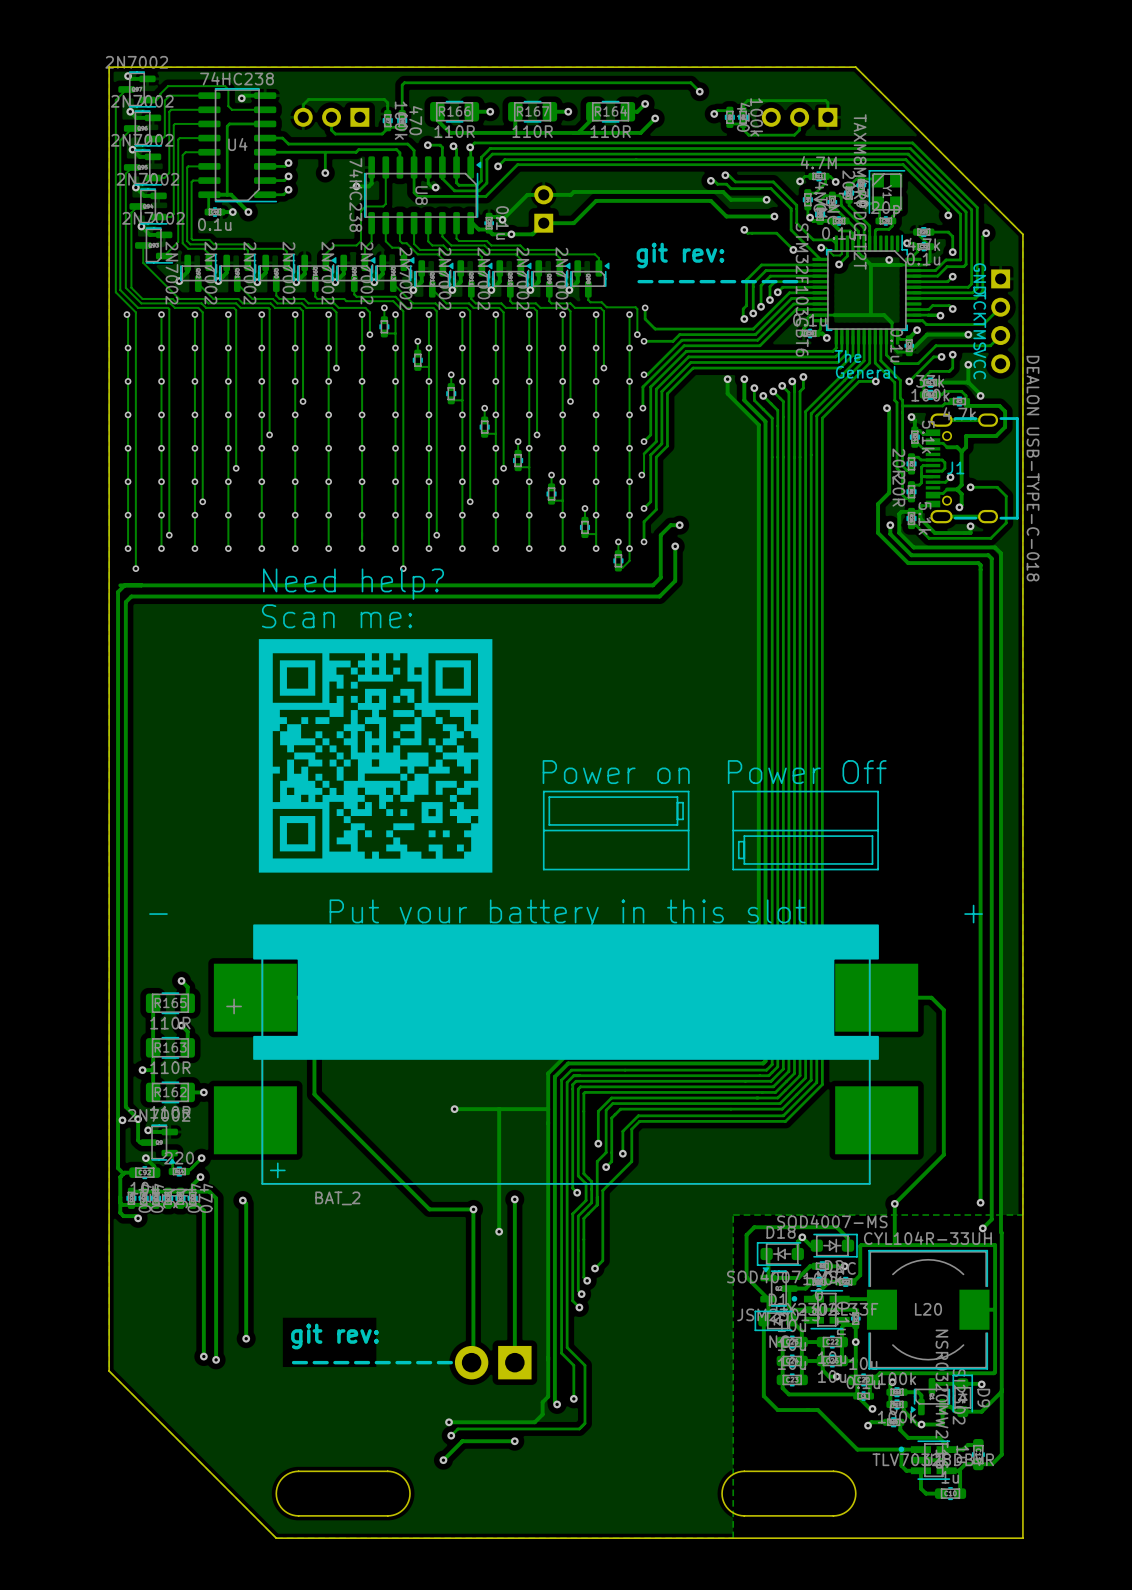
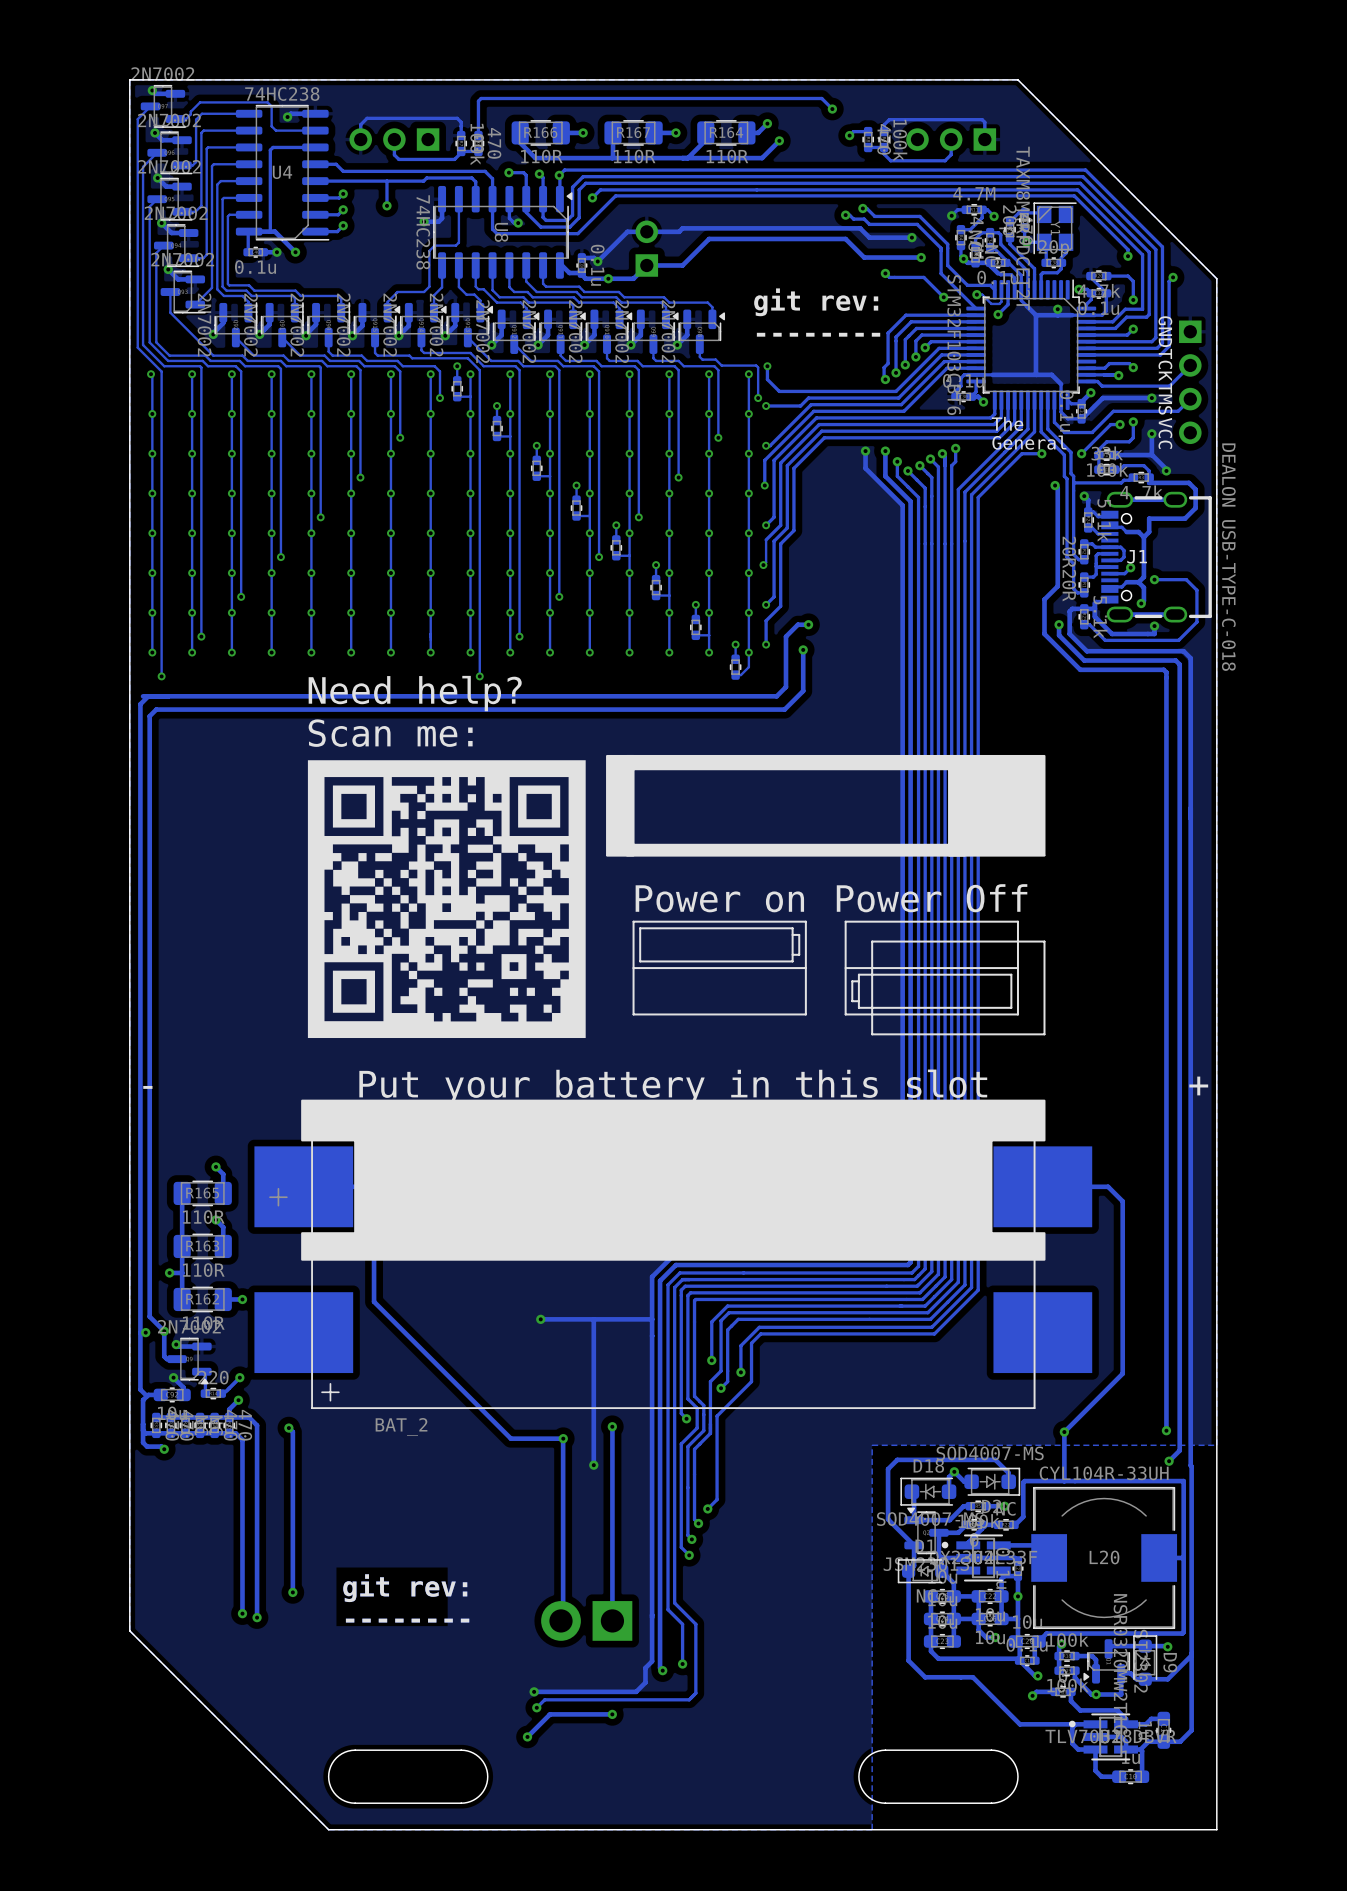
drawing: none -> [606, 754, 1046, 857]
text position: Power on (616, 772) -> Power on (719, 898)
text position: Power Off (807, 772) -> Power Off (932, 898)
line: none -> (792, 928) (792, 961) (640, 961) (640, 928) (792, 928)
line: (688, 791) (543, 791) (543, 869) (688, 869) (688, 791) -> (1017, 921) (845, 921) (845, 1014) (1017, 1014) (1017, 921)
line: (677, 797) (549, 797) (549, 824) (677, 824) -> (805, 948) (805, 921) (633, 921) (633, 1014) (805, 1014) (805, 981)
line: (677, 802) (683, 802) (683, 819) (677, 819) -> (792, 934) (799, 934) (799, 954) (792, 954)
line: (688, 830) (543, 830) -> (805, 968) (633, 968)
line: (878, 830) (733, 830) -> (1017, 968) (845, 968)
line: (872, 836) (744, 836) (744, 863) (872, 863) (872, 836) -> (1011, 974) (858, 974) (858, 1007) (1011, 1007) (1011, 974)
line: (744, 841) (738, 841) (738, 858) (744, 858) -> (858, 981) (852, 981) (852, 1001) (858, 1001)

